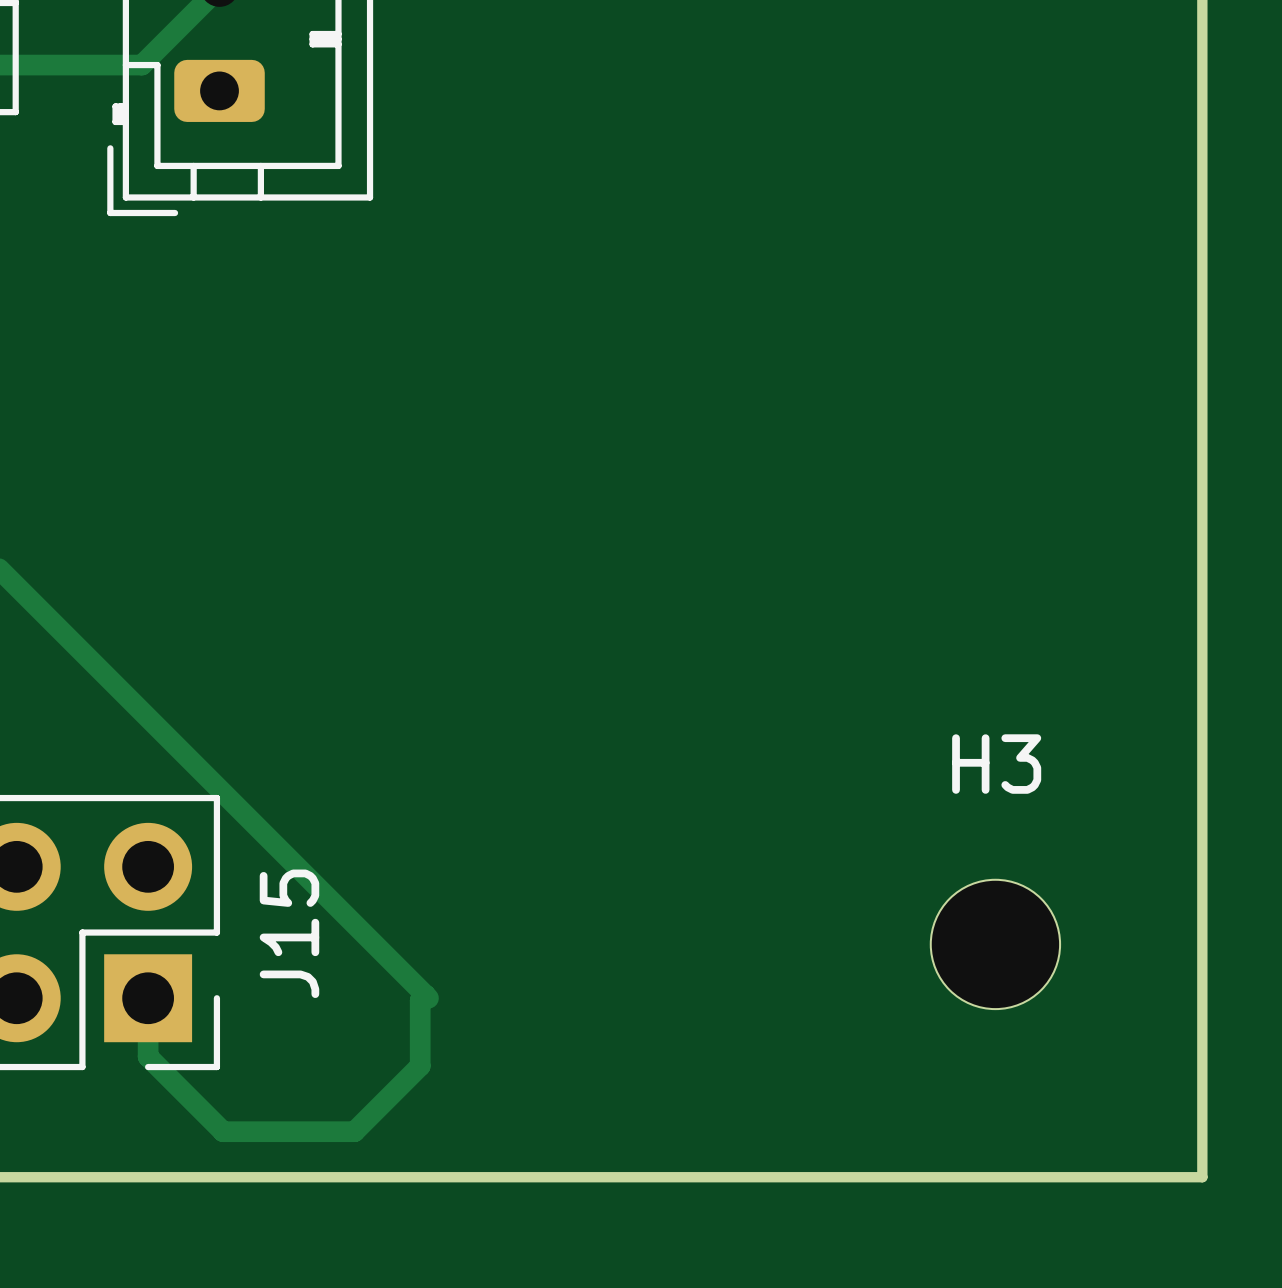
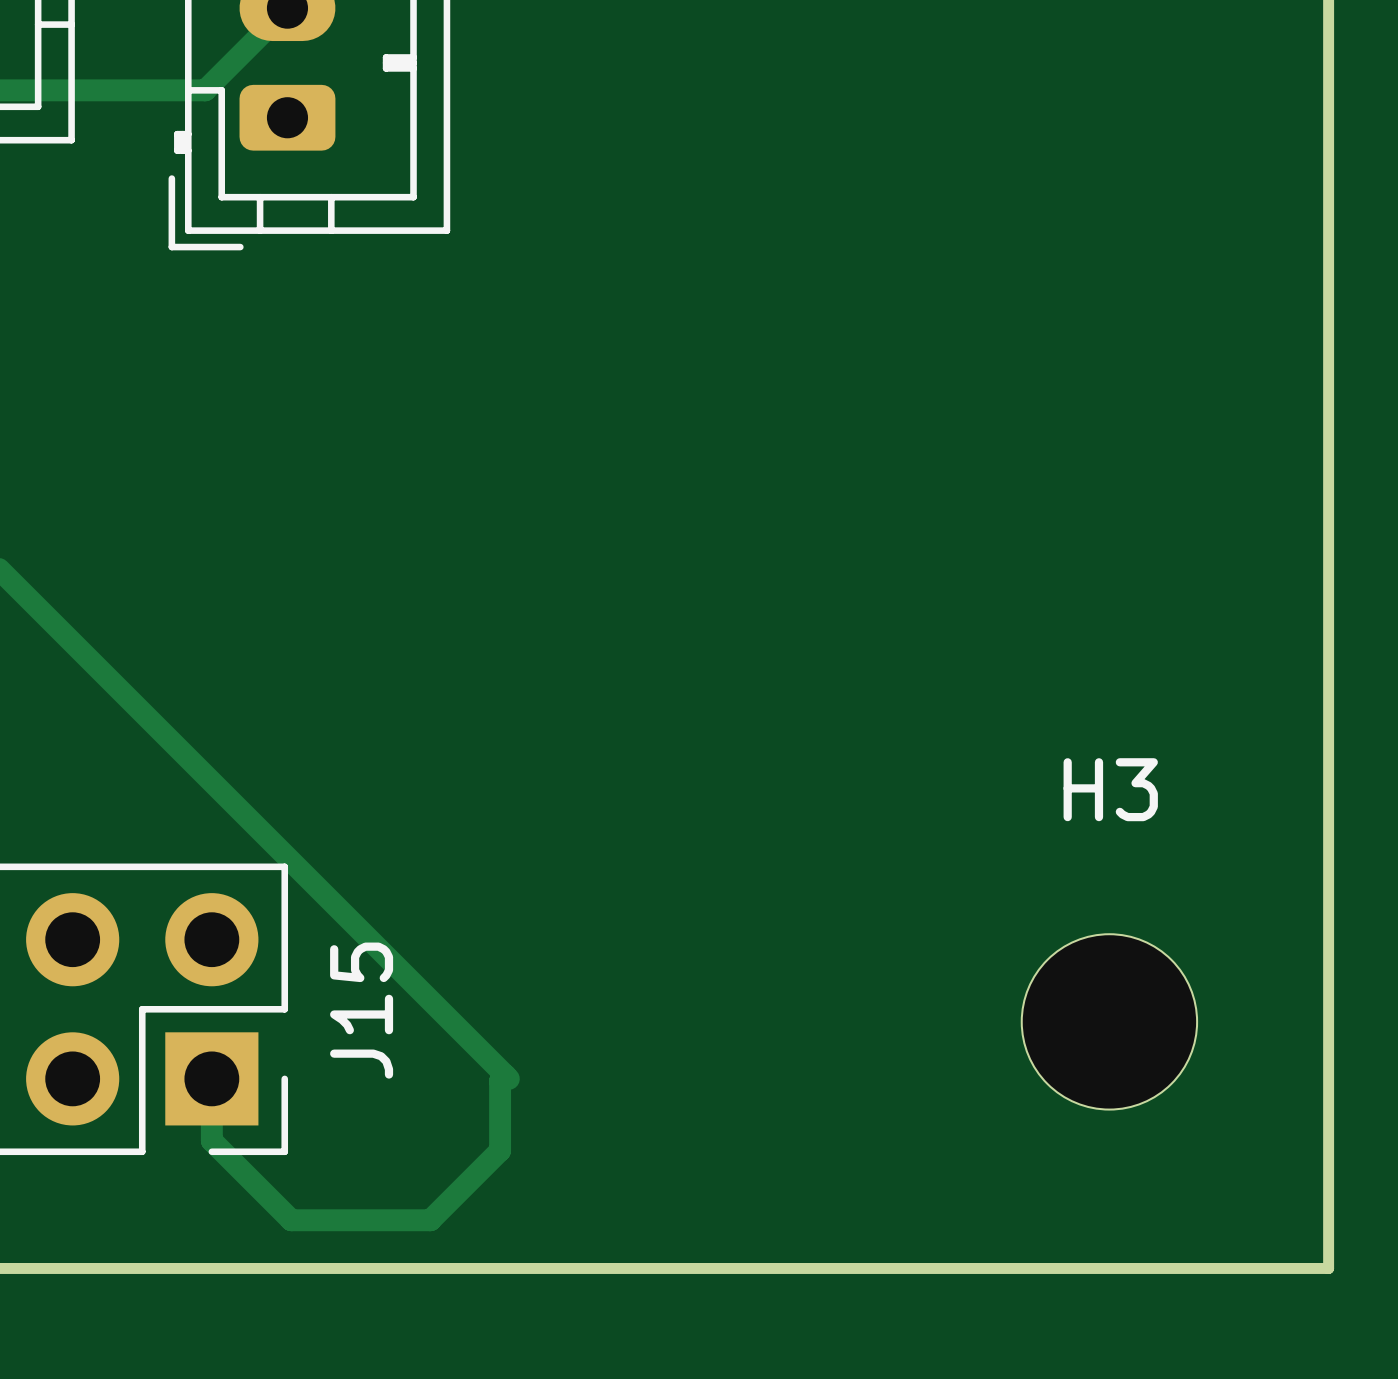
H3 name position: H3 (996, 764) -> H3 (1110, 789)
H3 footprint: [930, 879, 1061, 1010] -> [1021, 934, 1198, 1110]

